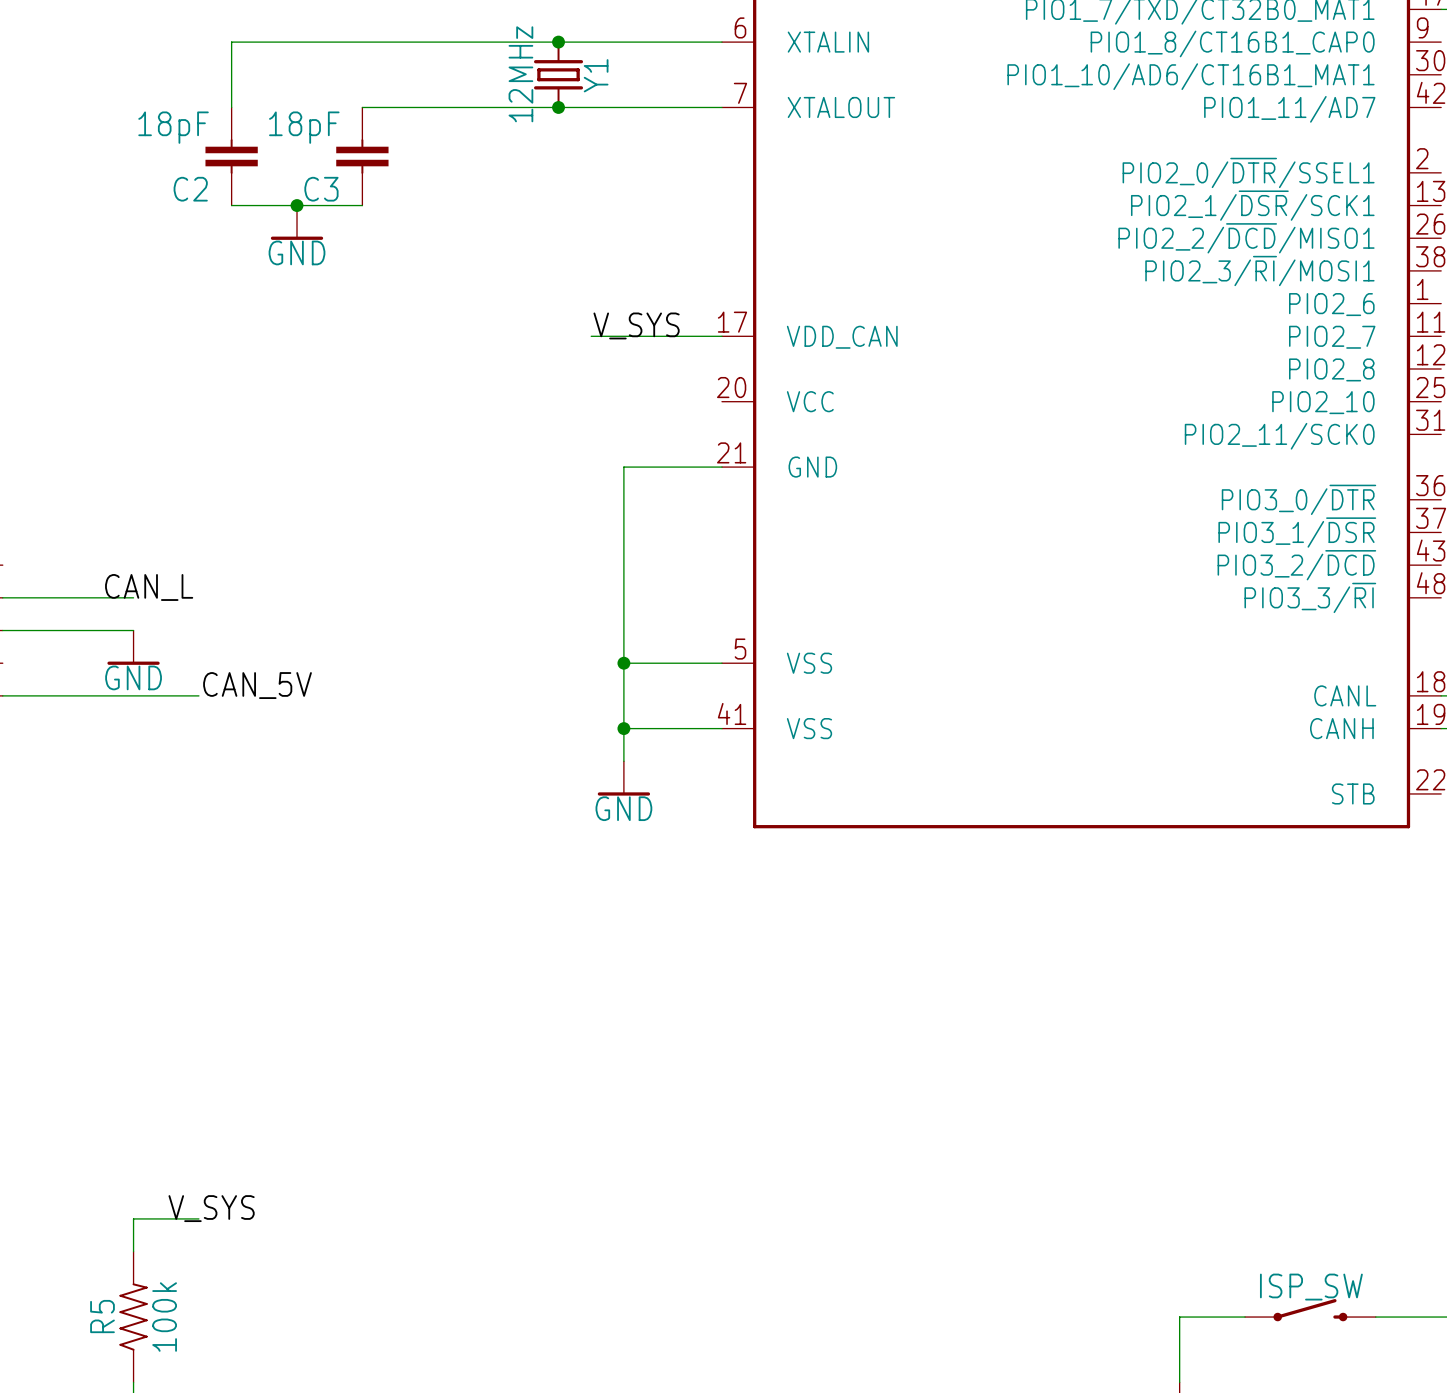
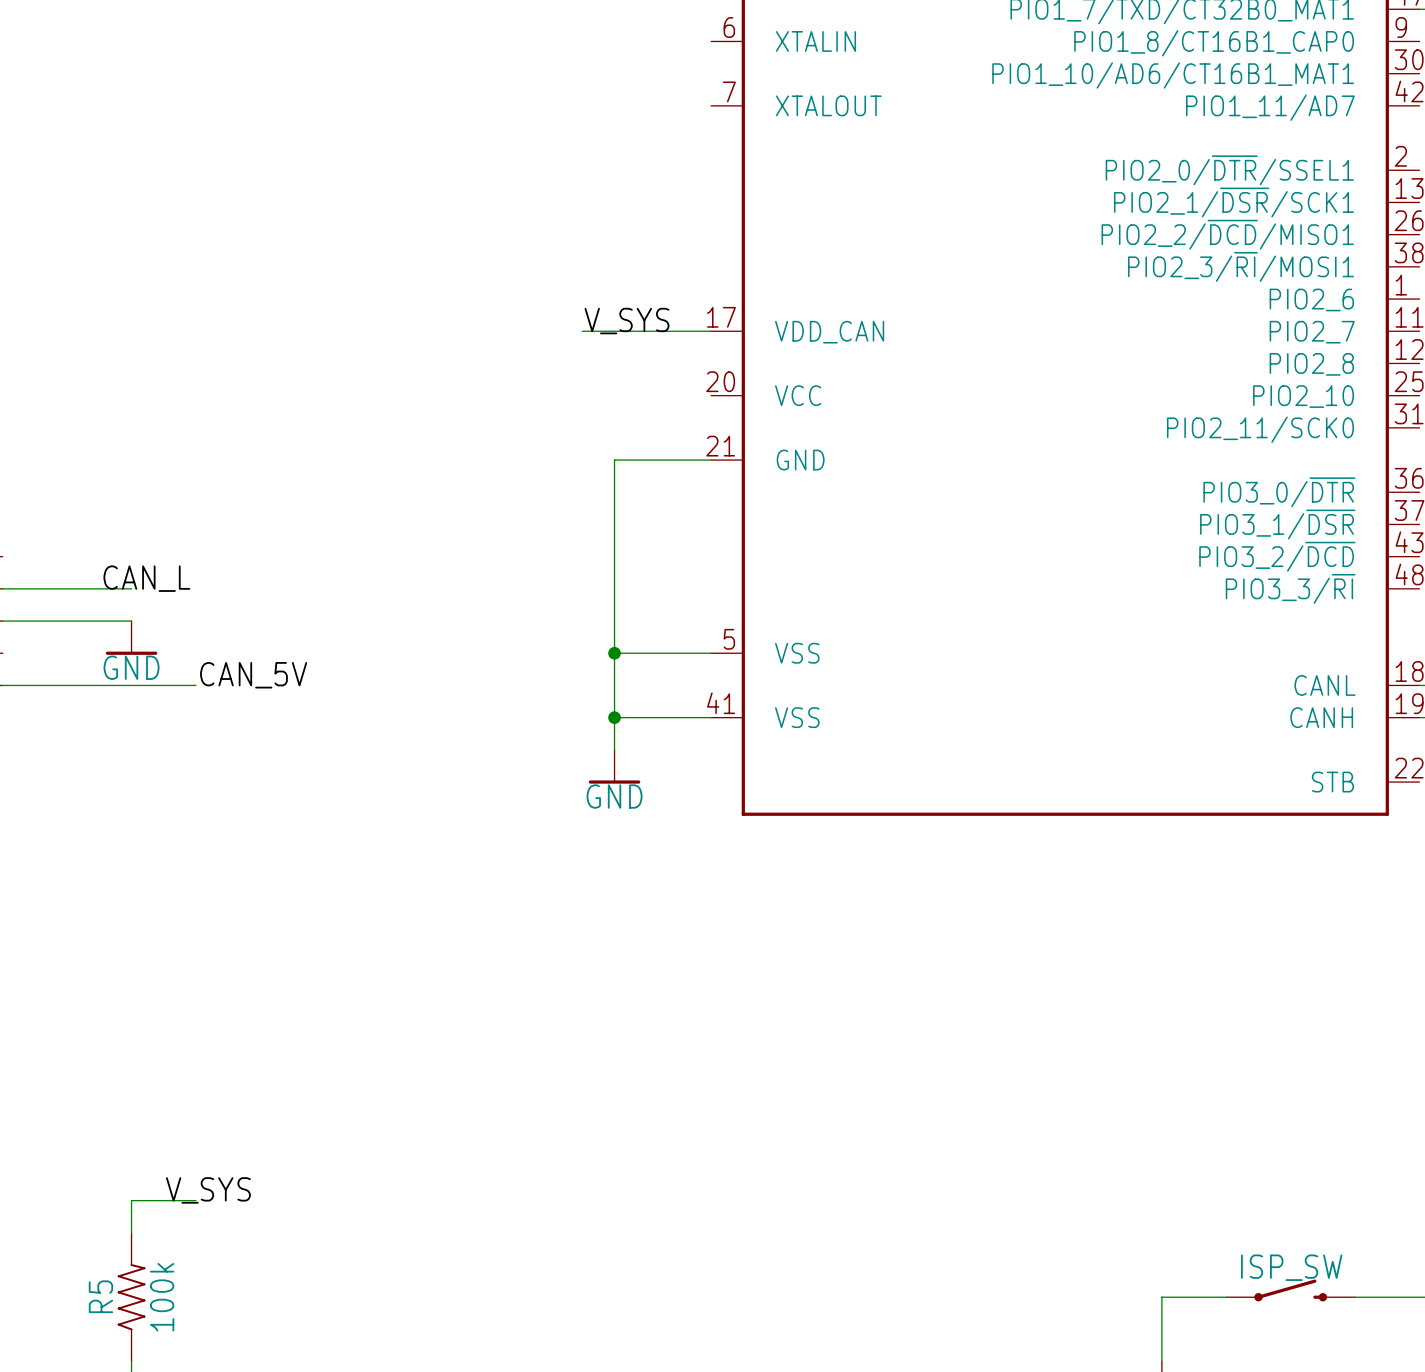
junction: (558, 42) -> none
wire: (721, 42) (231, 42) (231, 107) -> none
Y1: 12MHz (558, 74) -> none
wire: (362, 107) (721, 107) -> none
junction: (558, 107) -> none
C2: 18pF (231, 156) -> none
C3: 18pF (362, 156) -> none
wire: (231, 205) (362, 205) -> none
junction: (297, 205) -> none
power symbol: GND (297, 222) -> none

